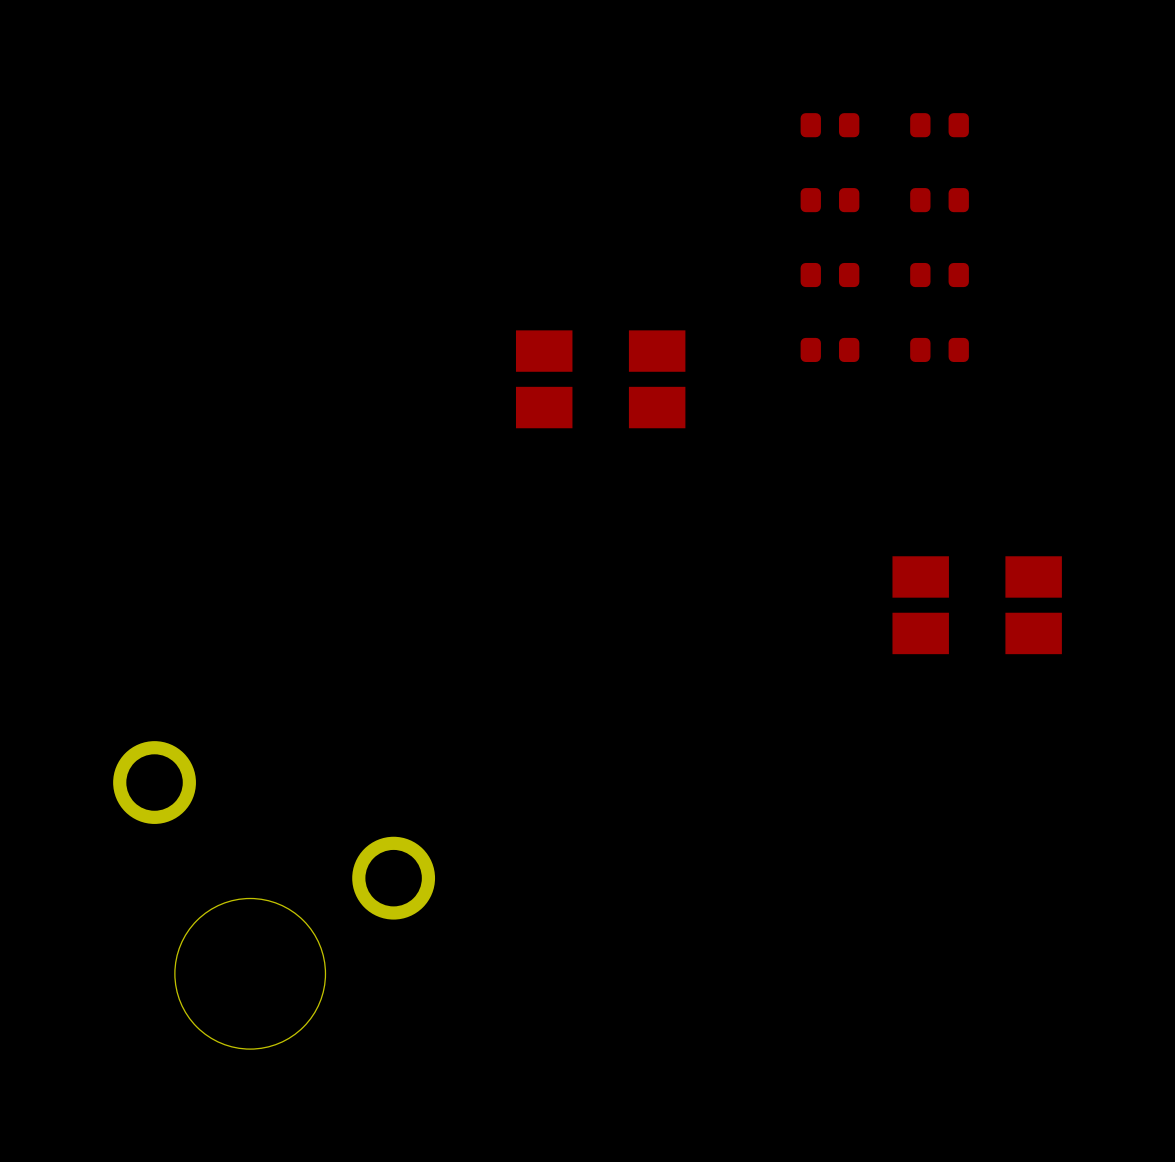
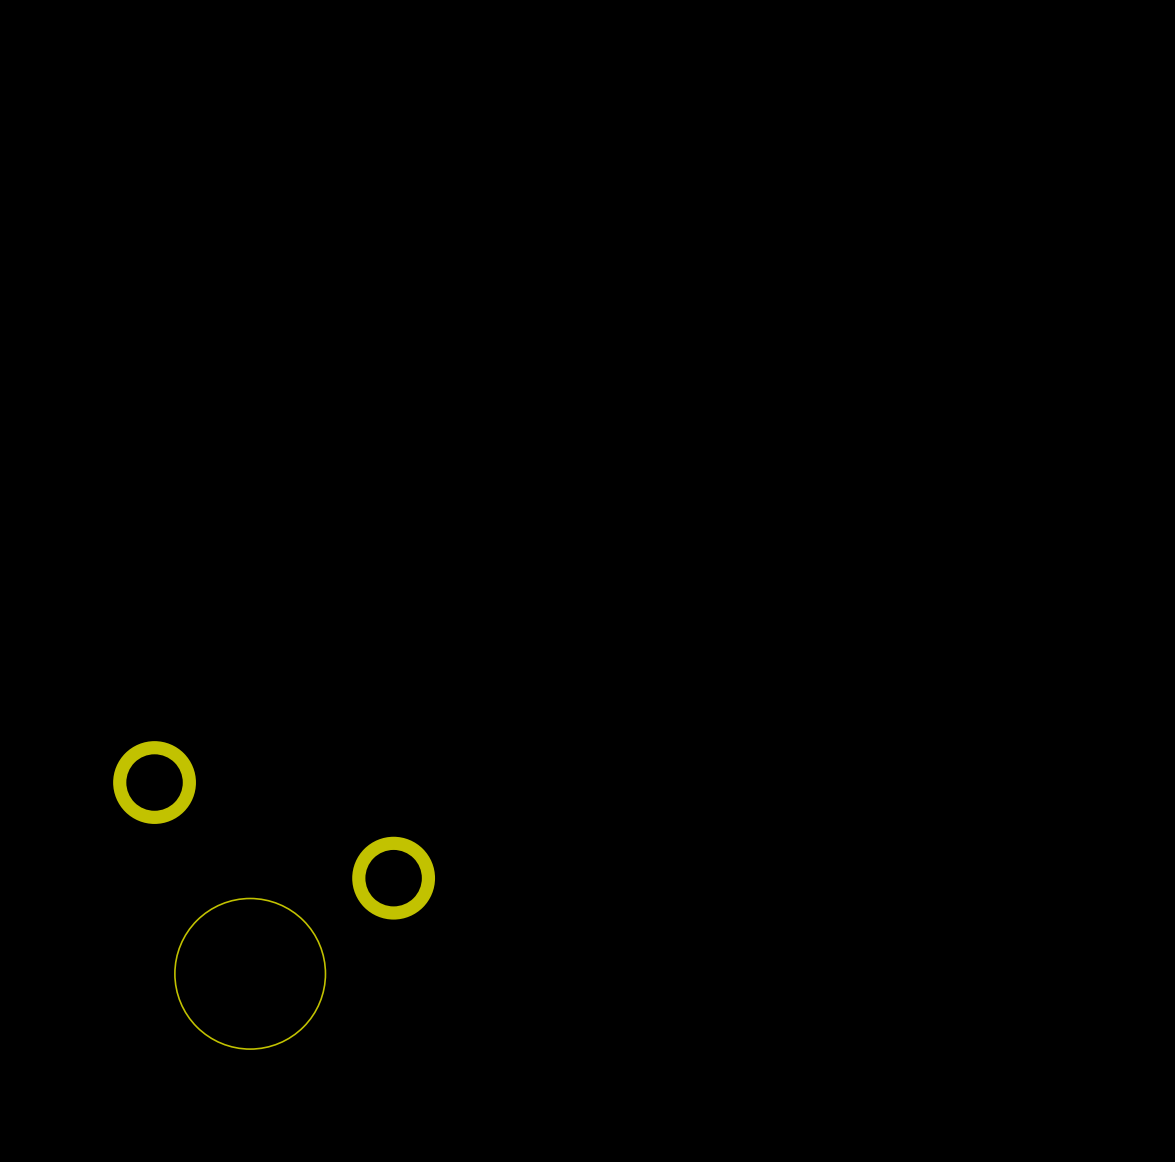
part: (829, 125) -> none
part: (939, 125) -> none
part: (829, 200) -> none
part: (939, 200) -> none
part: (829, 275) -> none
part: (939, 275) -> none
part: (829, 349) -> none
part: (939, 349) -> none
part: (600, 379) -> none
part: (977, 605) -> none

